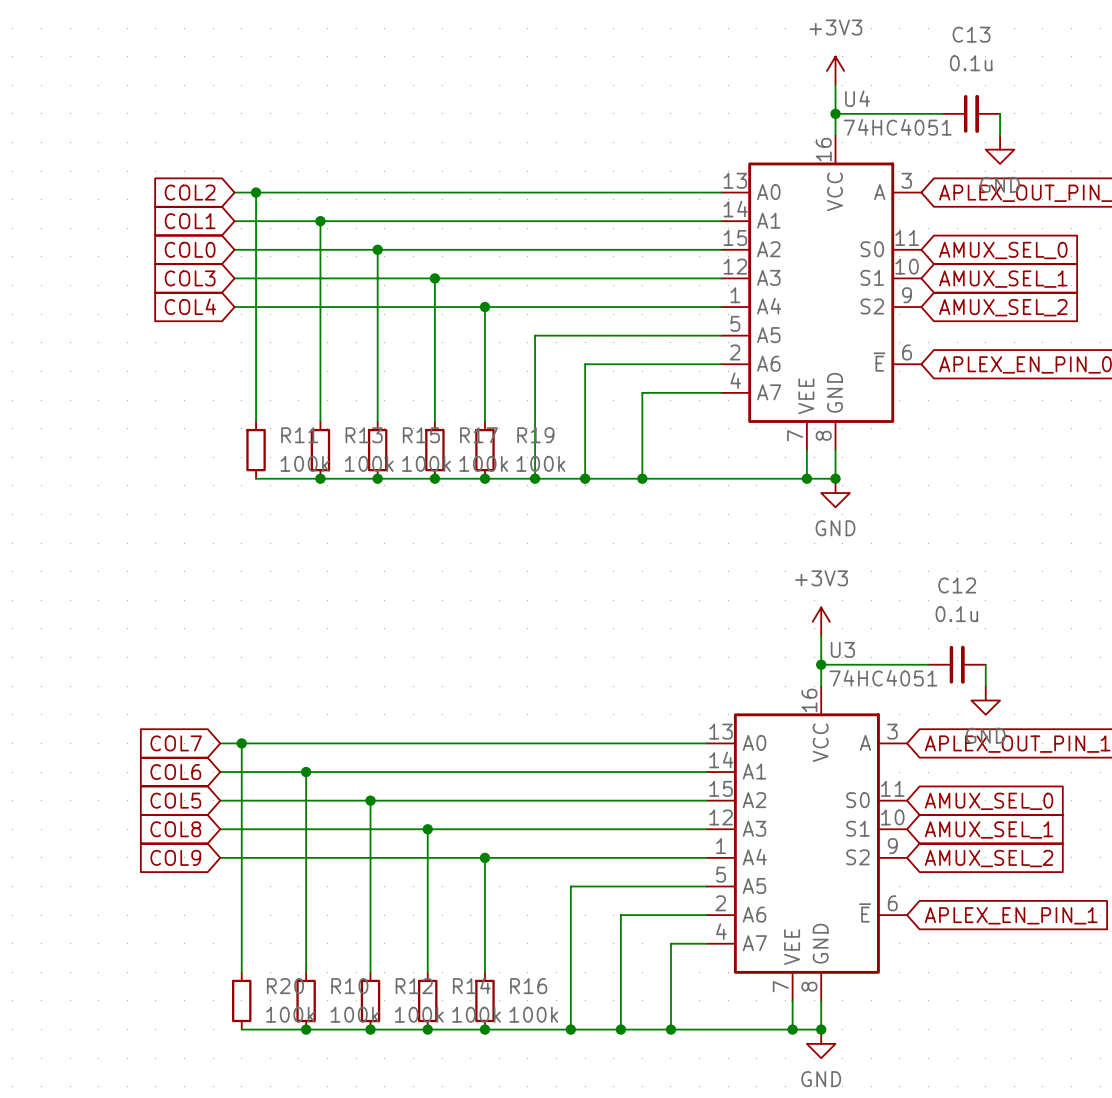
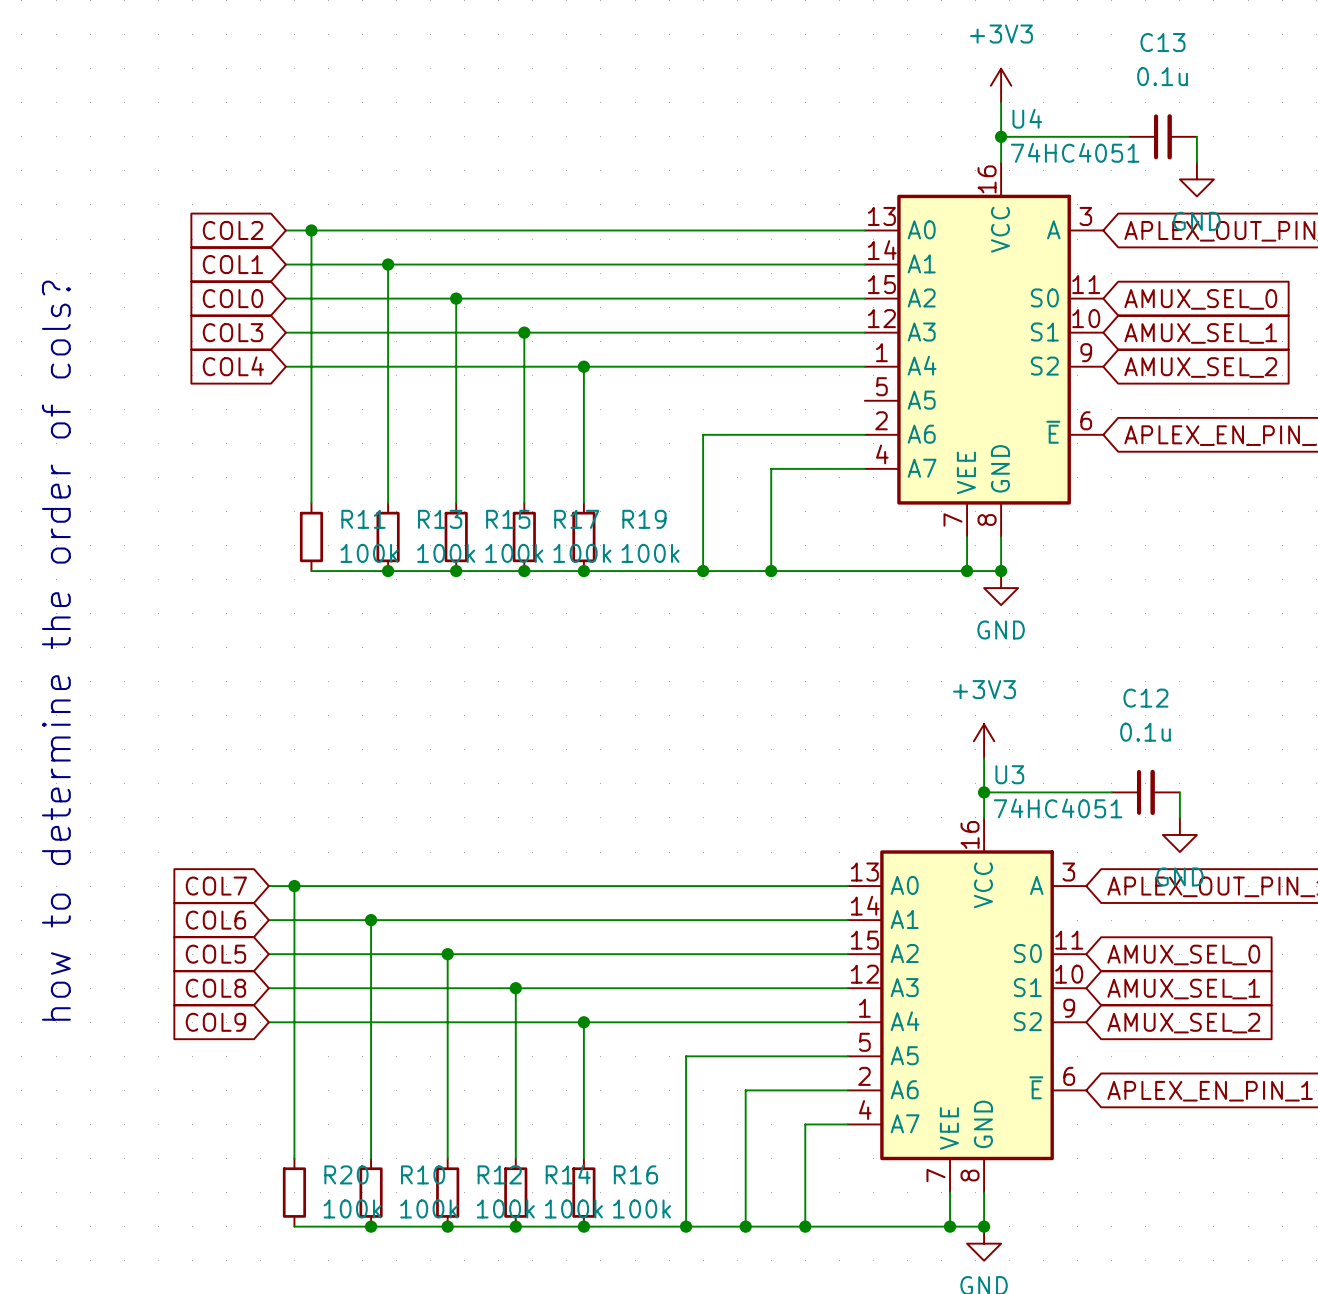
wire: (721, 335) (535, 335) (535, 478) -> none
junction: (535, 478) -> none
text: none -> how to determine the order of cols? (56, 650)

